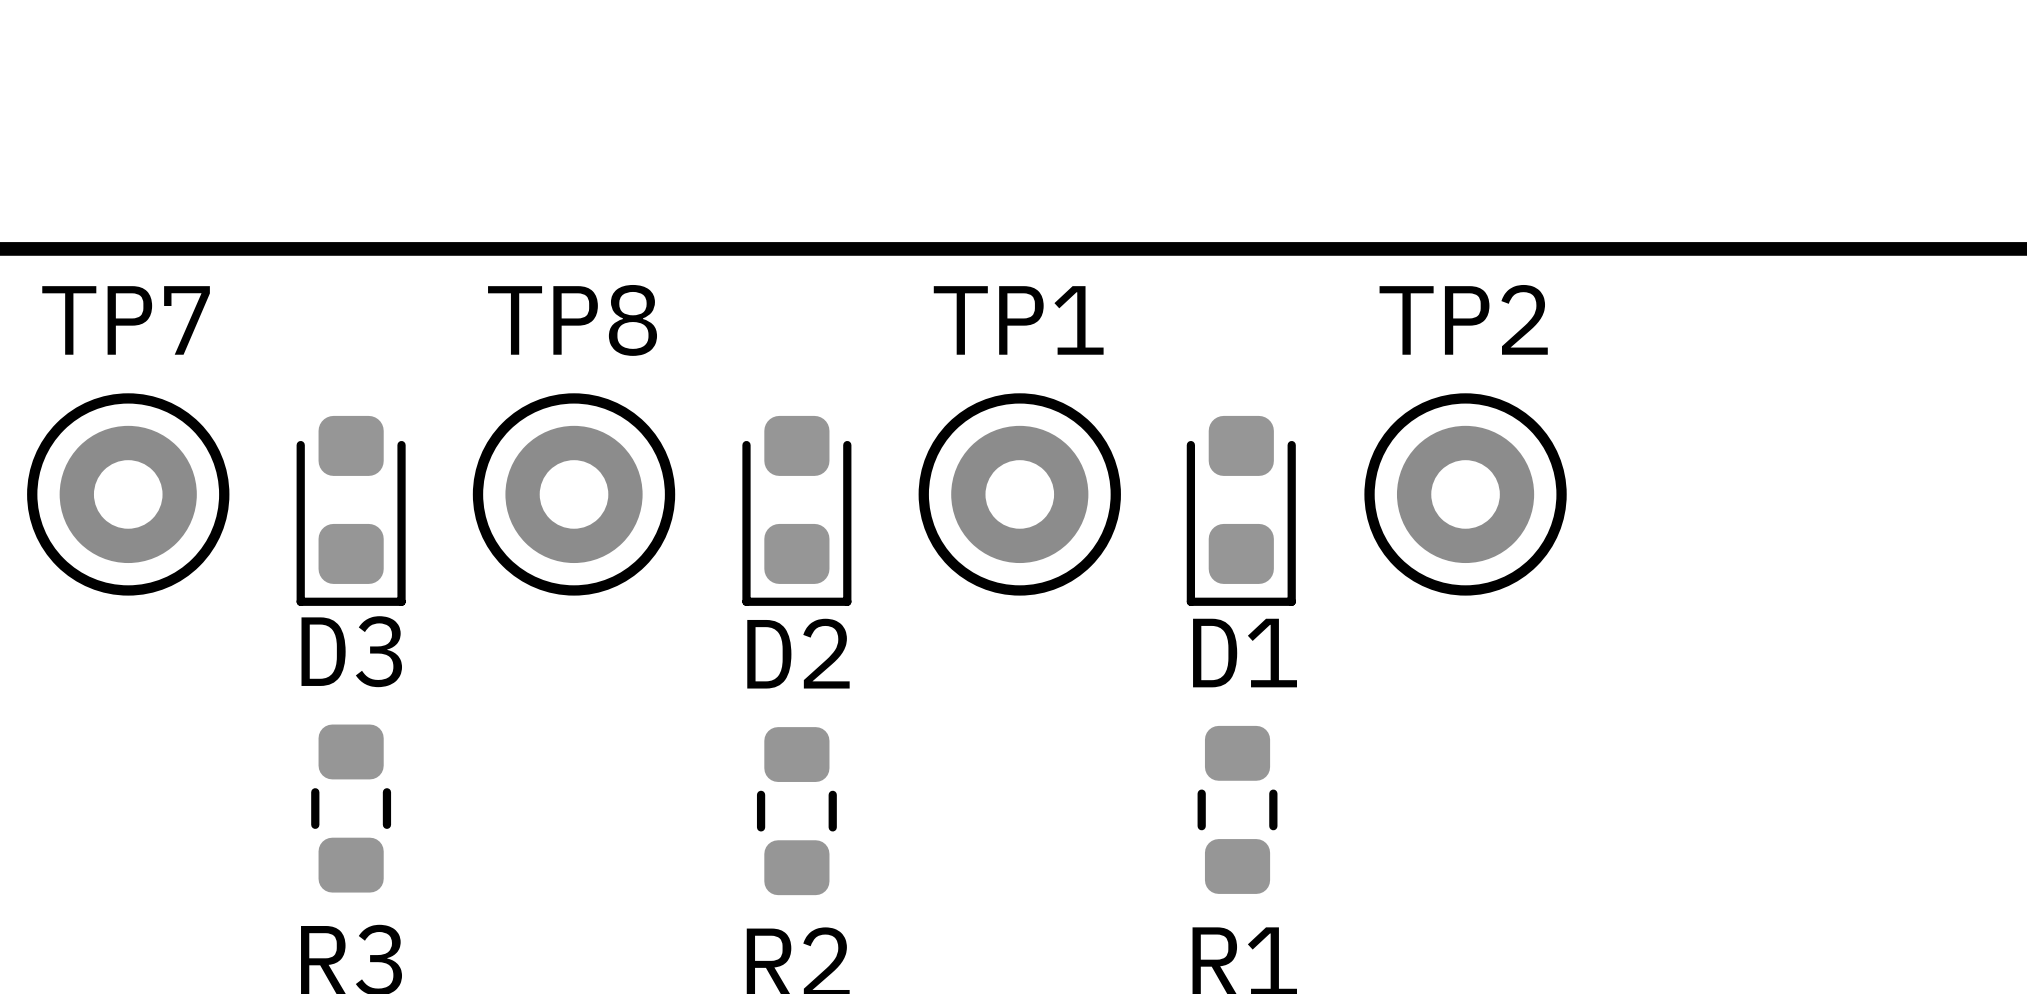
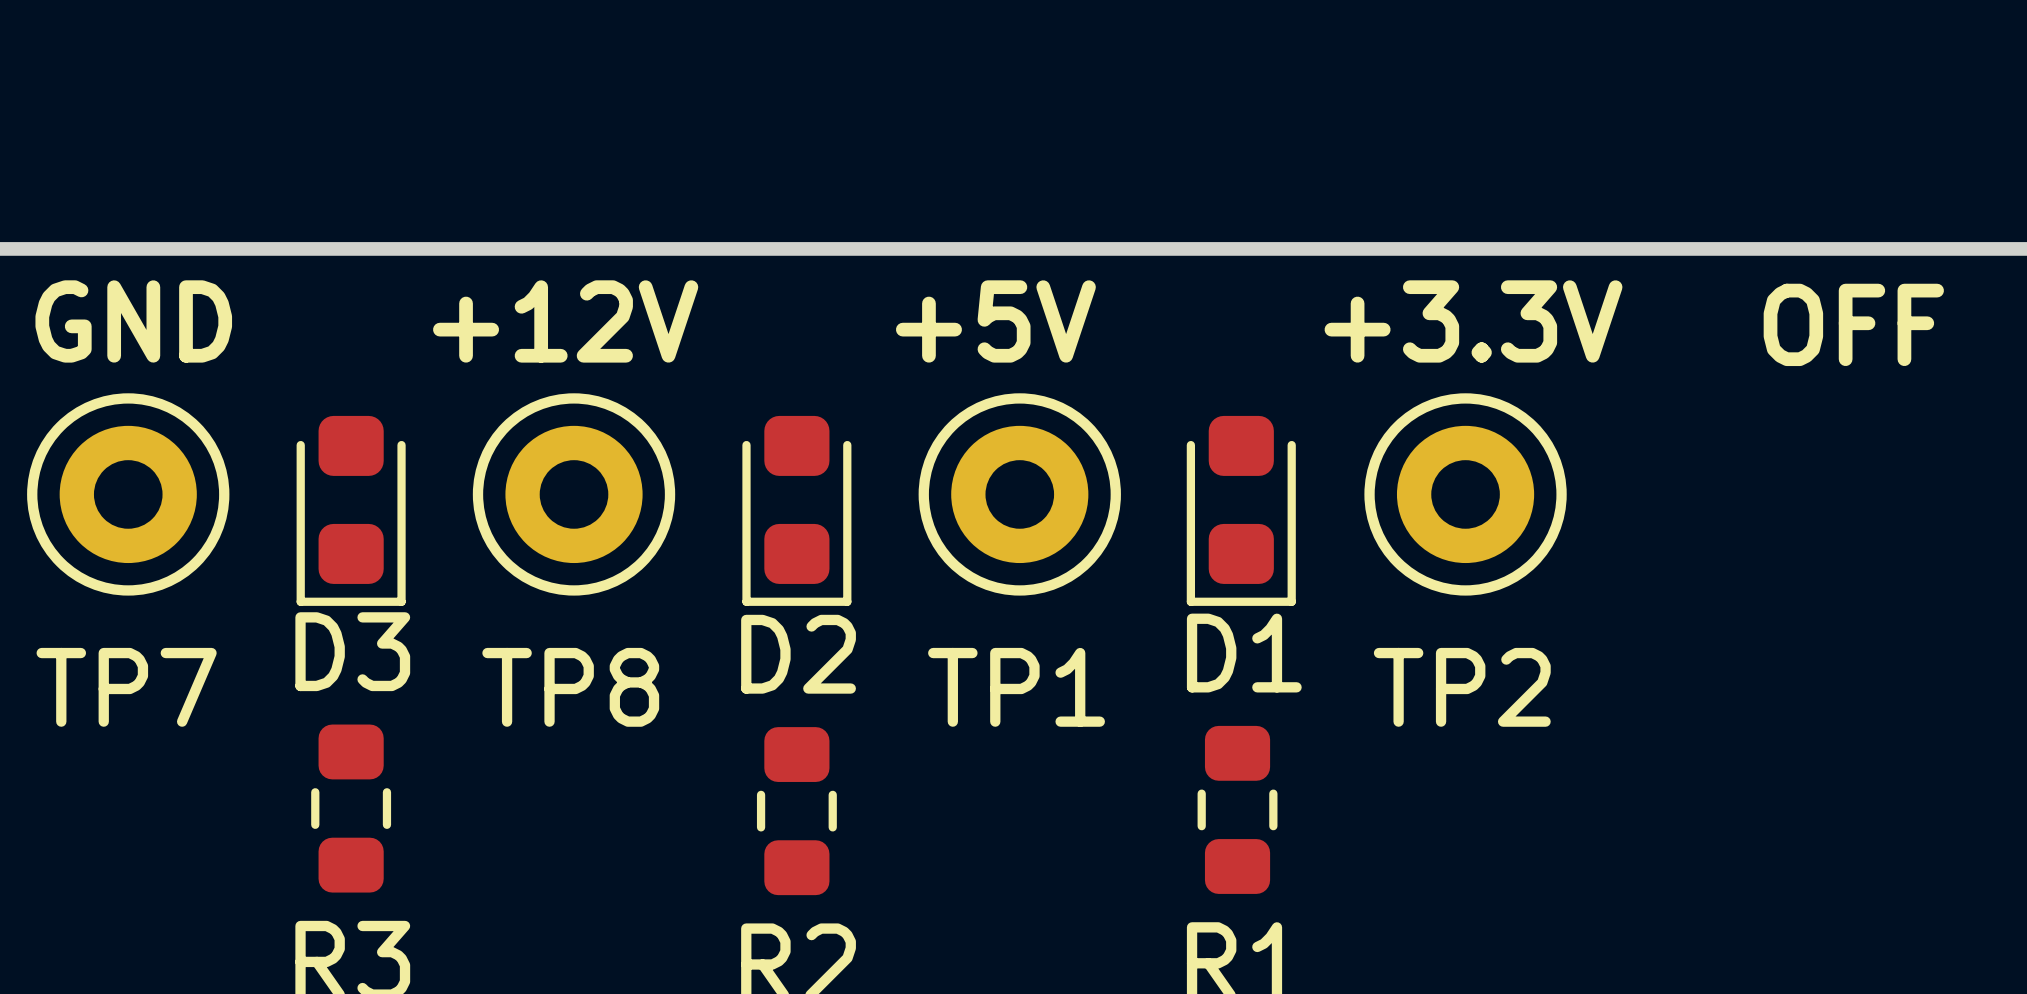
TP2 name position: TP2 (1463, 319) -> TP2 (1462, 687)
TP7 name position: TP7 (126, 320) -> TP7 (126, 687)
text: none -> +12V (565, 321)
TP8 name position: TP8 (572, 320) -> TP8 (570, 687)
TP1 name position: TP1 (1018, 320) -> TP1 (1016, 687)
text: none -> GND (133, 321)
text: none -> +3.3V (1473, 321)
text: none -> +5V (995, 321)
text: none -> OFF (1853, 324)

